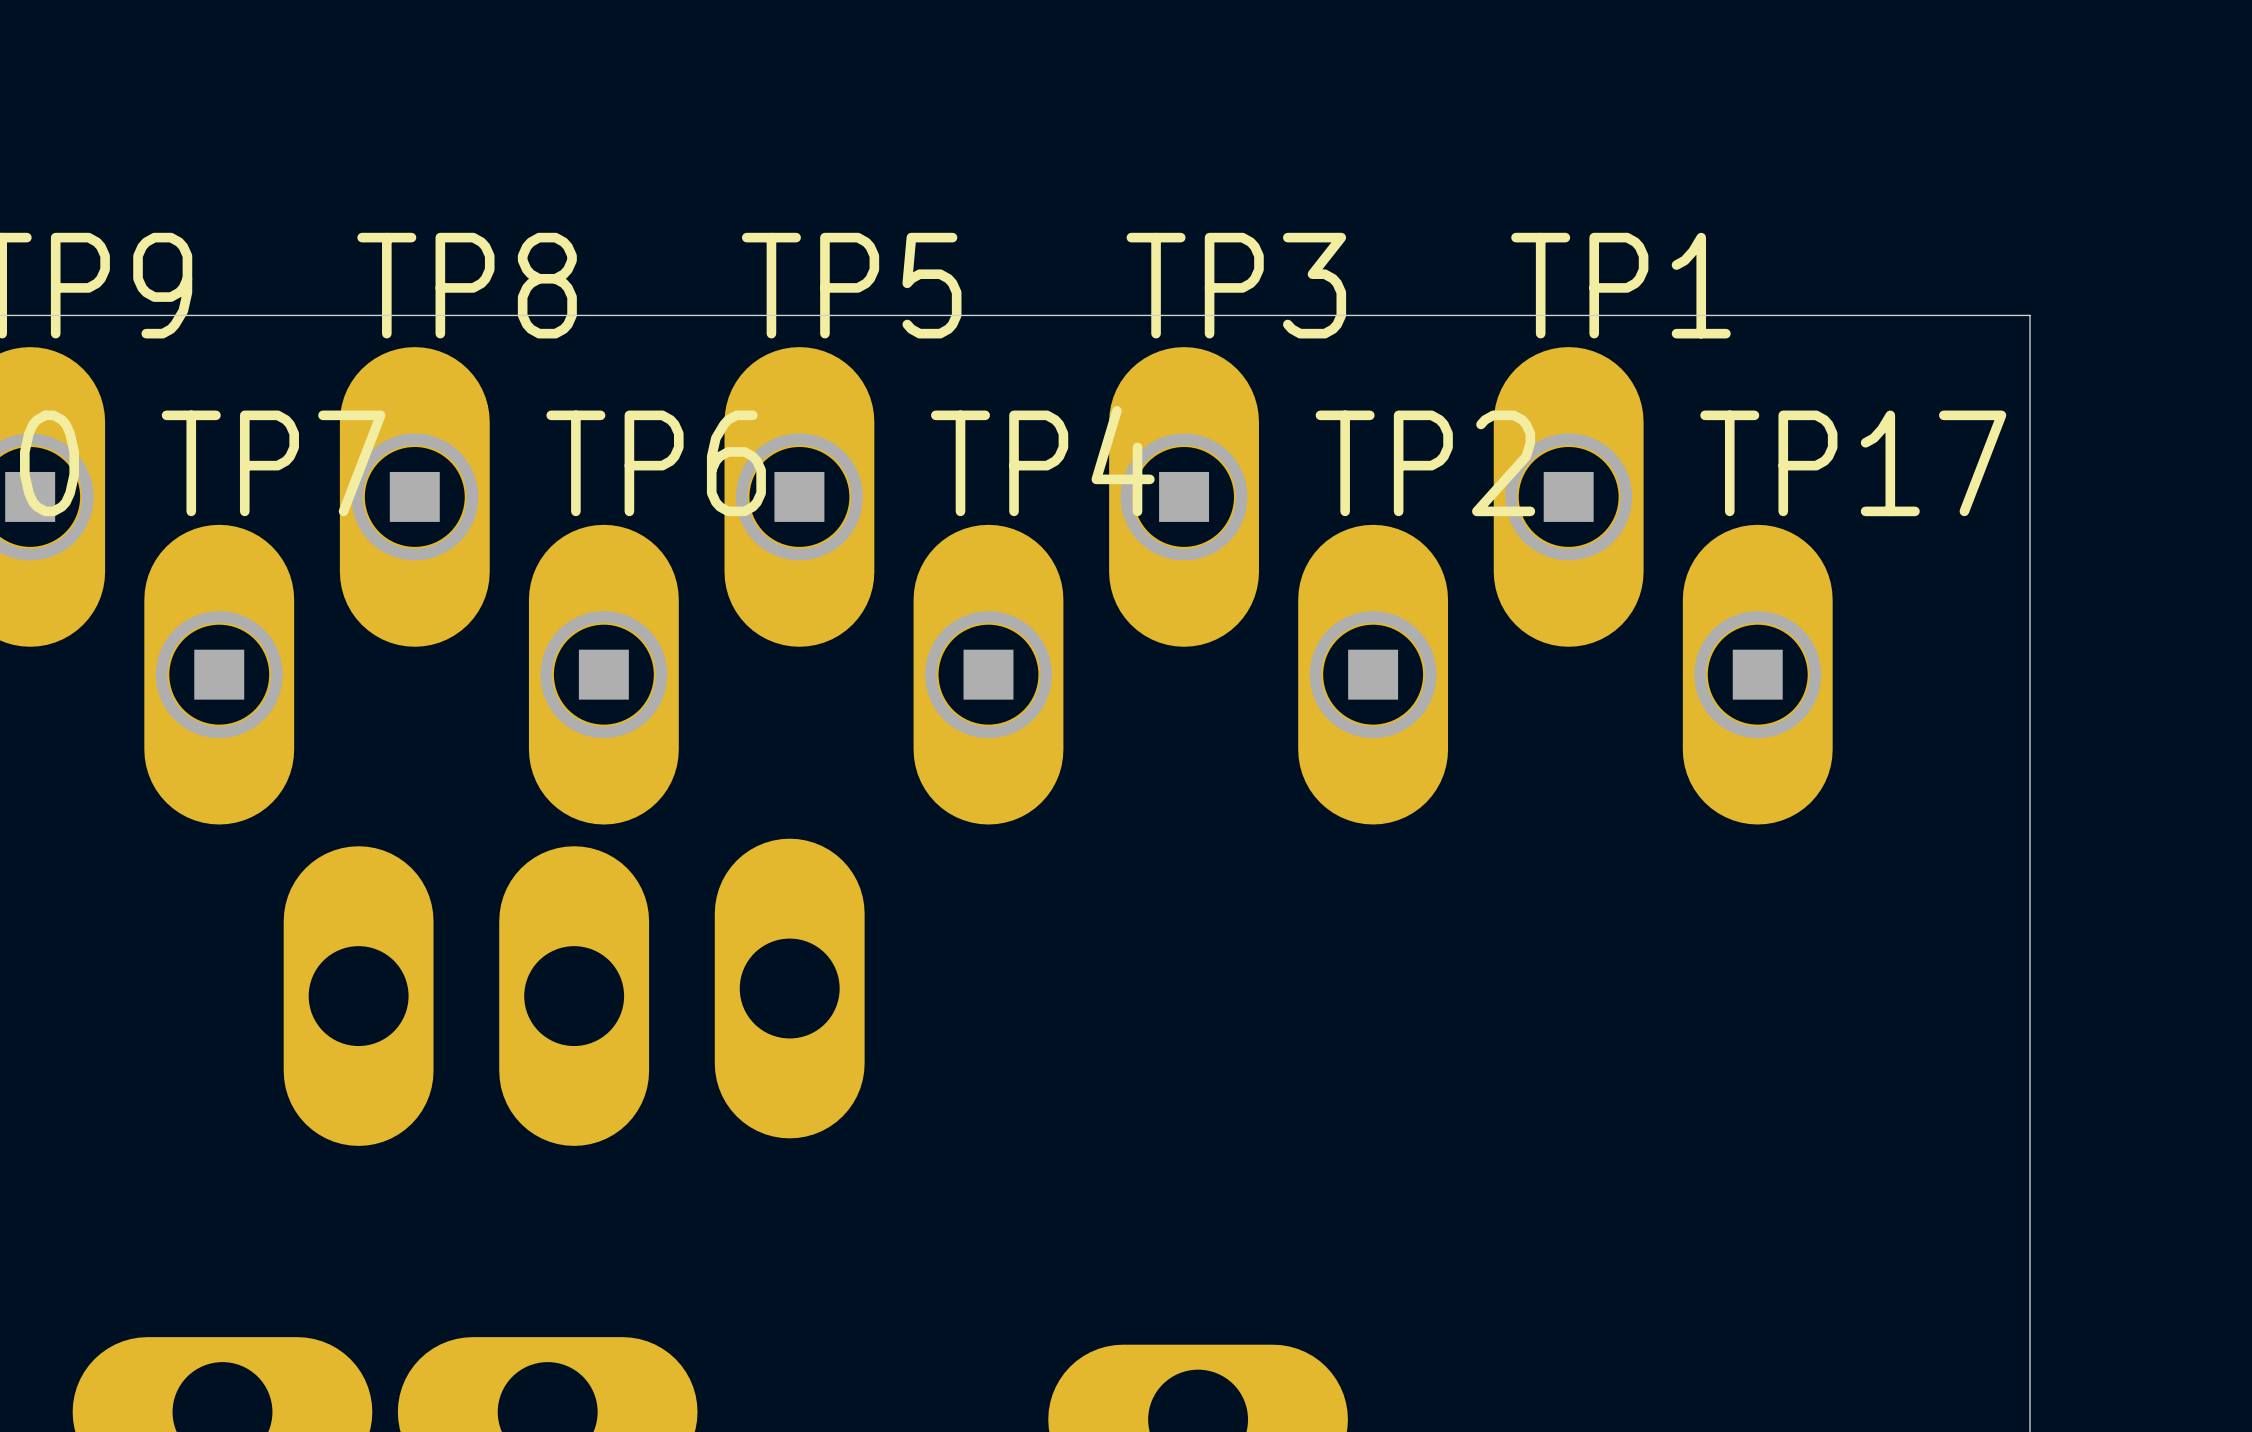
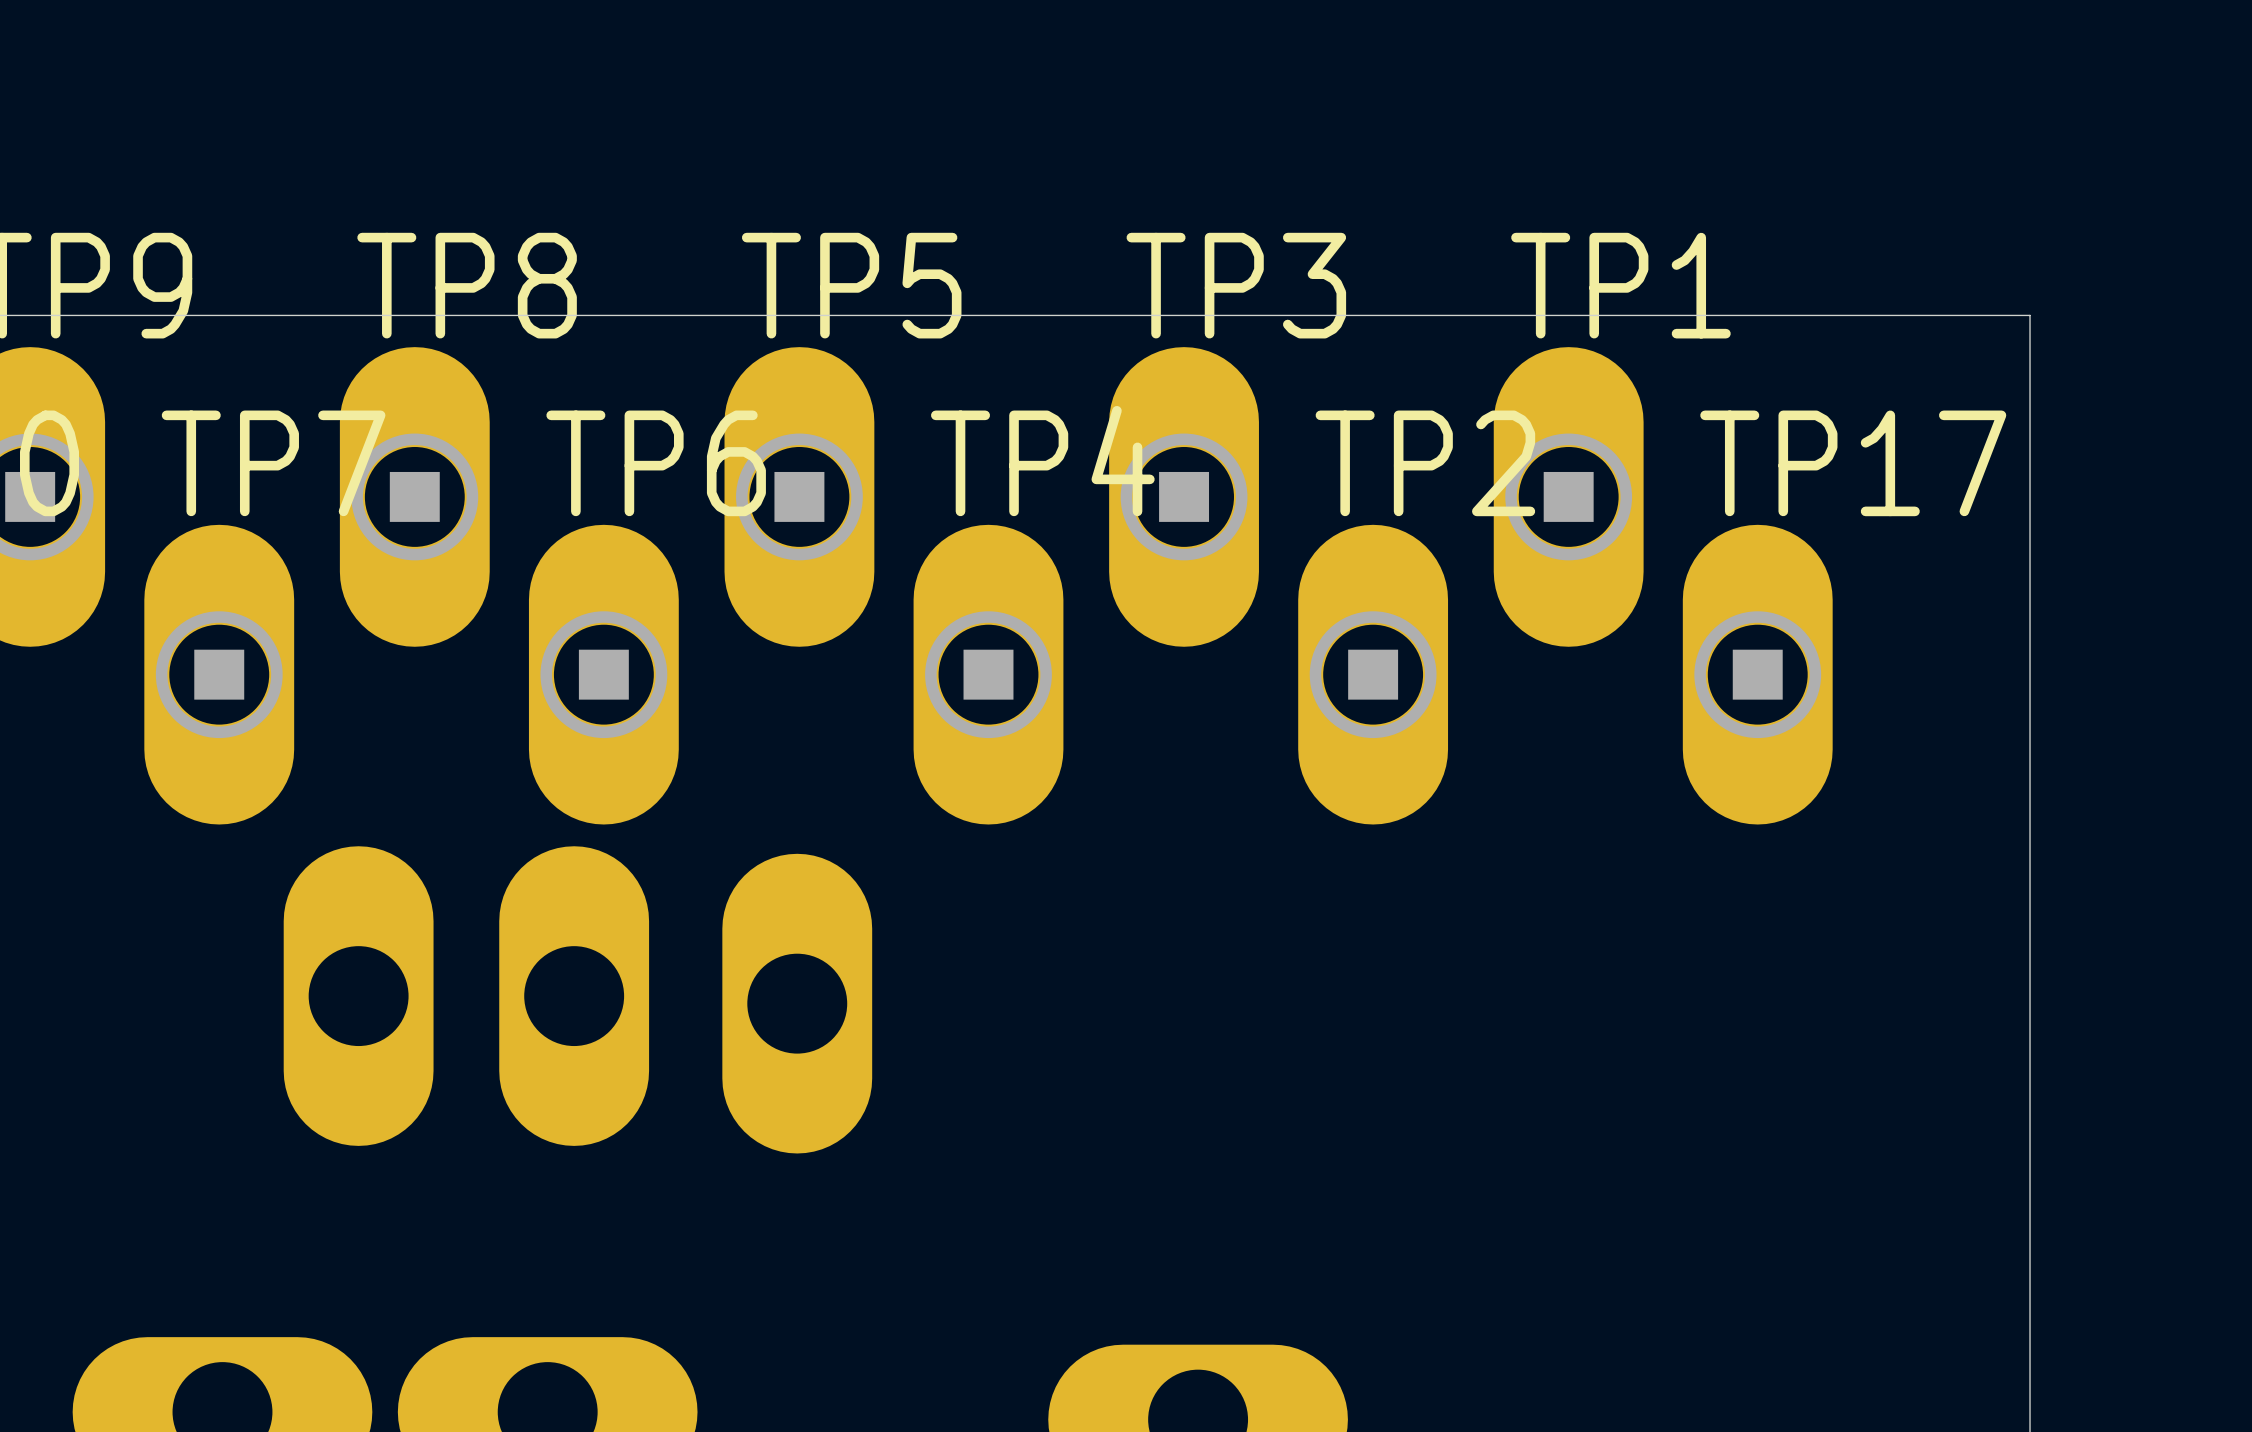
part position: (789, 988) -> (797, 1003)

